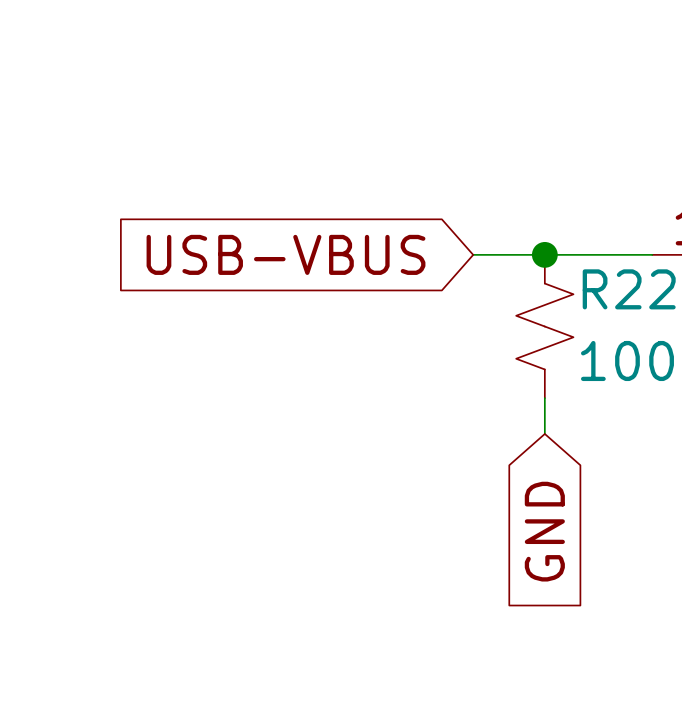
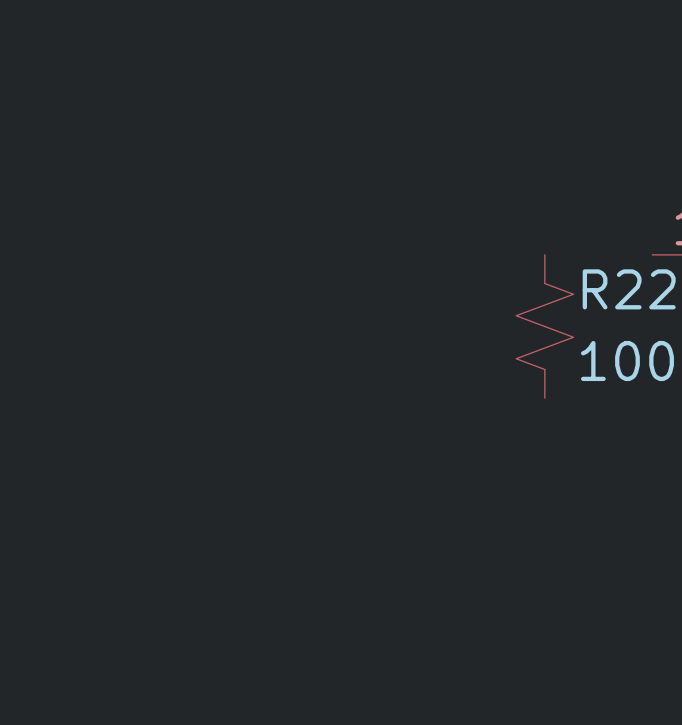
global label: USB-VBUS (286, 254) -> none
wire: (473, 254) (652, 254) -> none
junction: (544, 254) -> none
wire: (544, 398) (544, 433) -> none
global label: GND (544, 531) -> none

